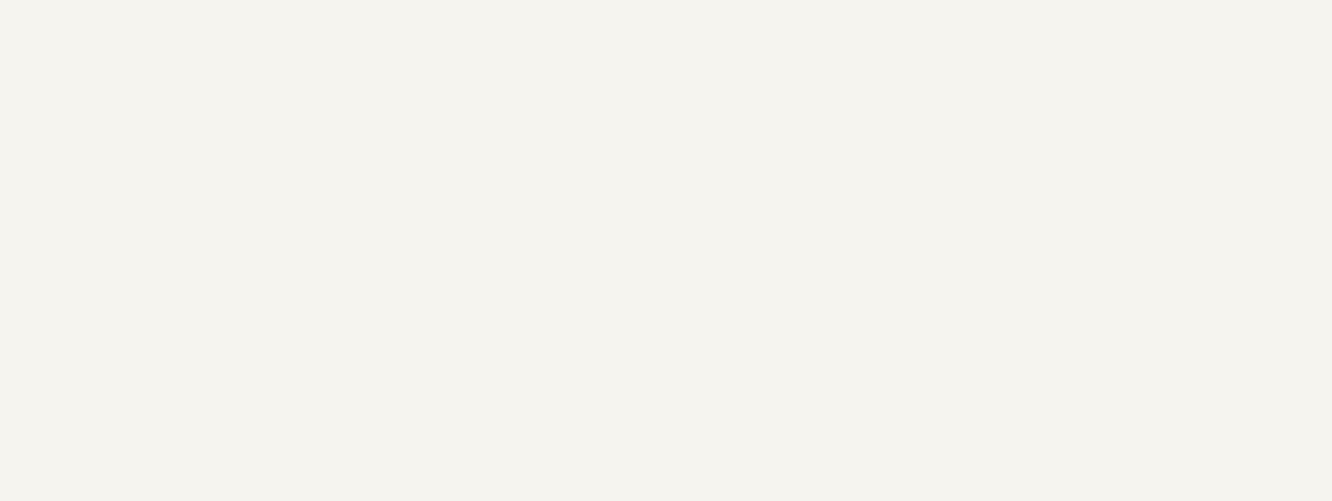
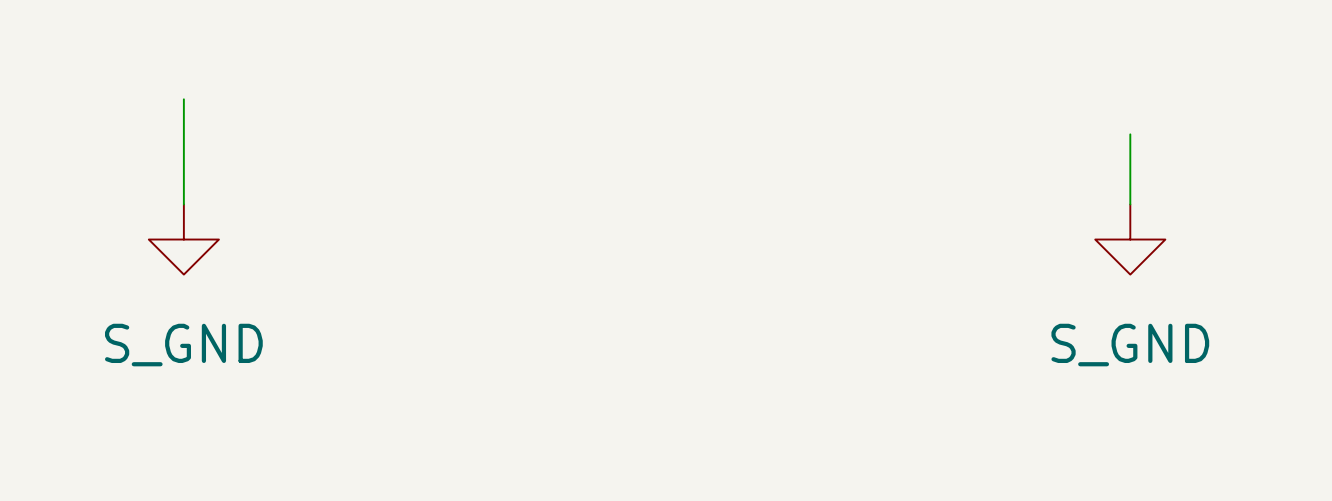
wire: none -> (183, 99) (183, 204)
wire: none -> (1130, 134) (1130, 204)
power symbol: none -> S_GND (183, 239)
power symbol: none -> S_GND (1130, 239)

